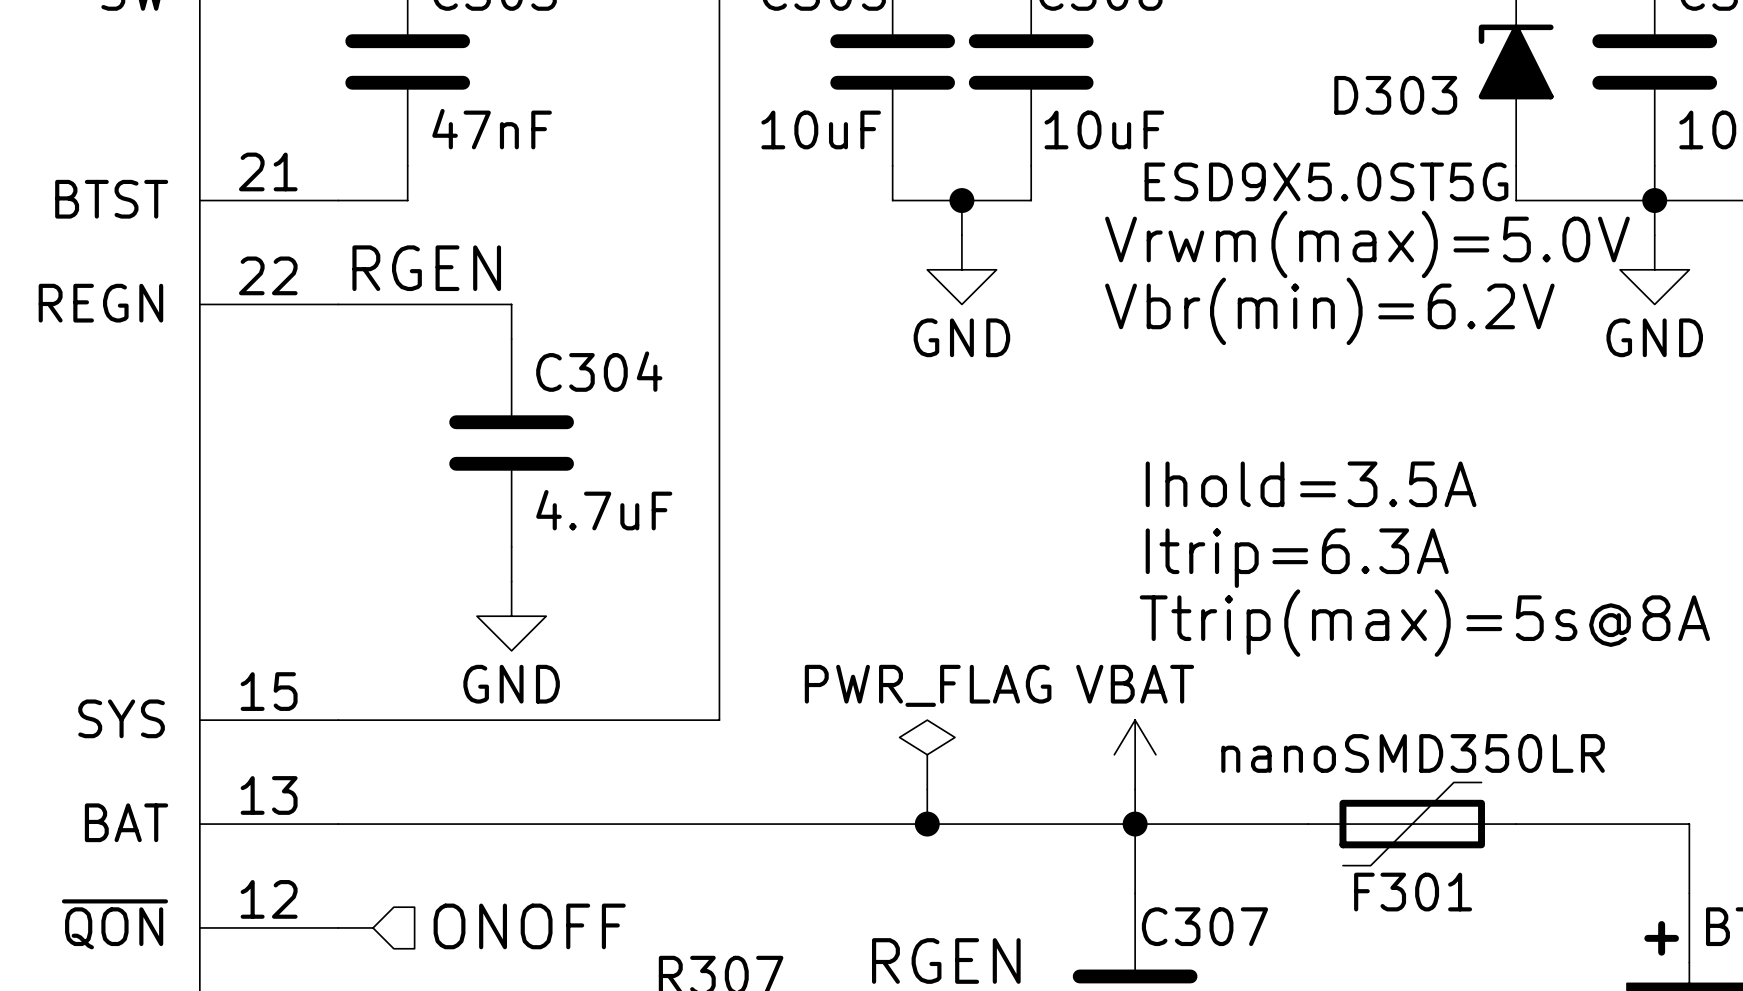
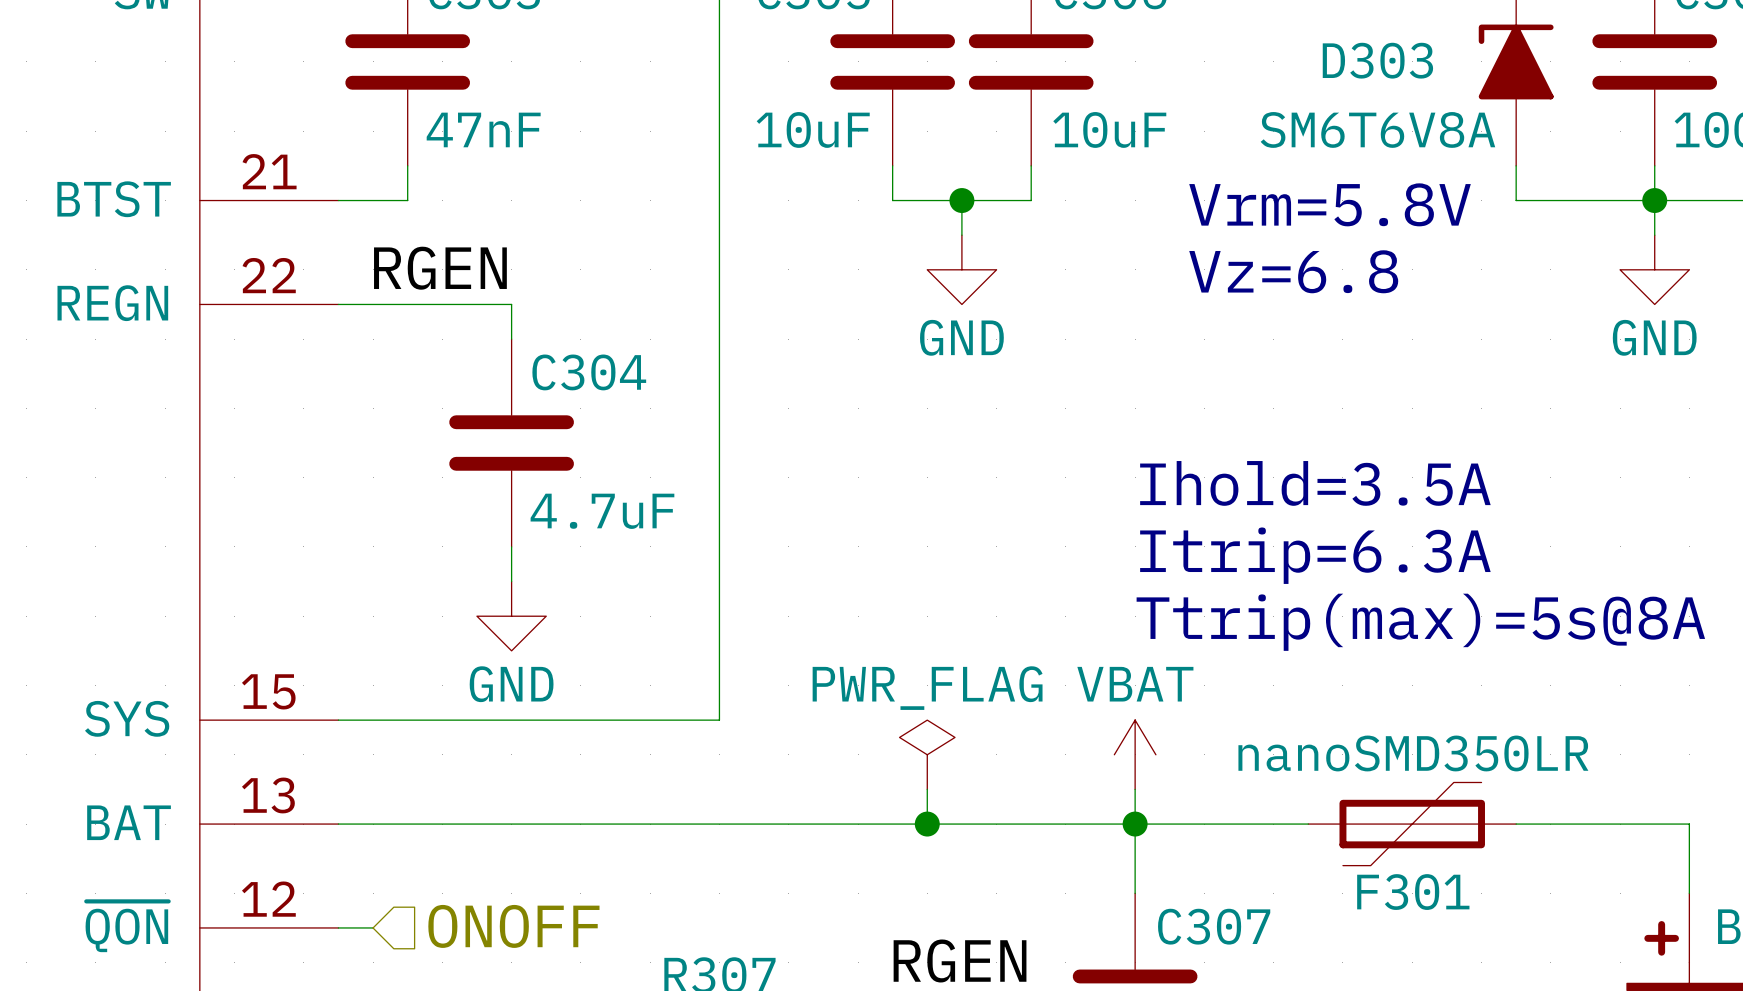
D303 name position: D303 (1395, 95) -> D303 (1377, 60)
D303 value: ESD9X5.0ST5G (1326, 181) -> SM6T6V8A (1377, 129)
text: Vrwm(max)=5.0V (1367, 244) -> Vrm=5.8V (1330, 204)
text: none -> Vz=6.8 (1293, 271)
text: Vbr(min)=6.2V (1329, 311) -> none

